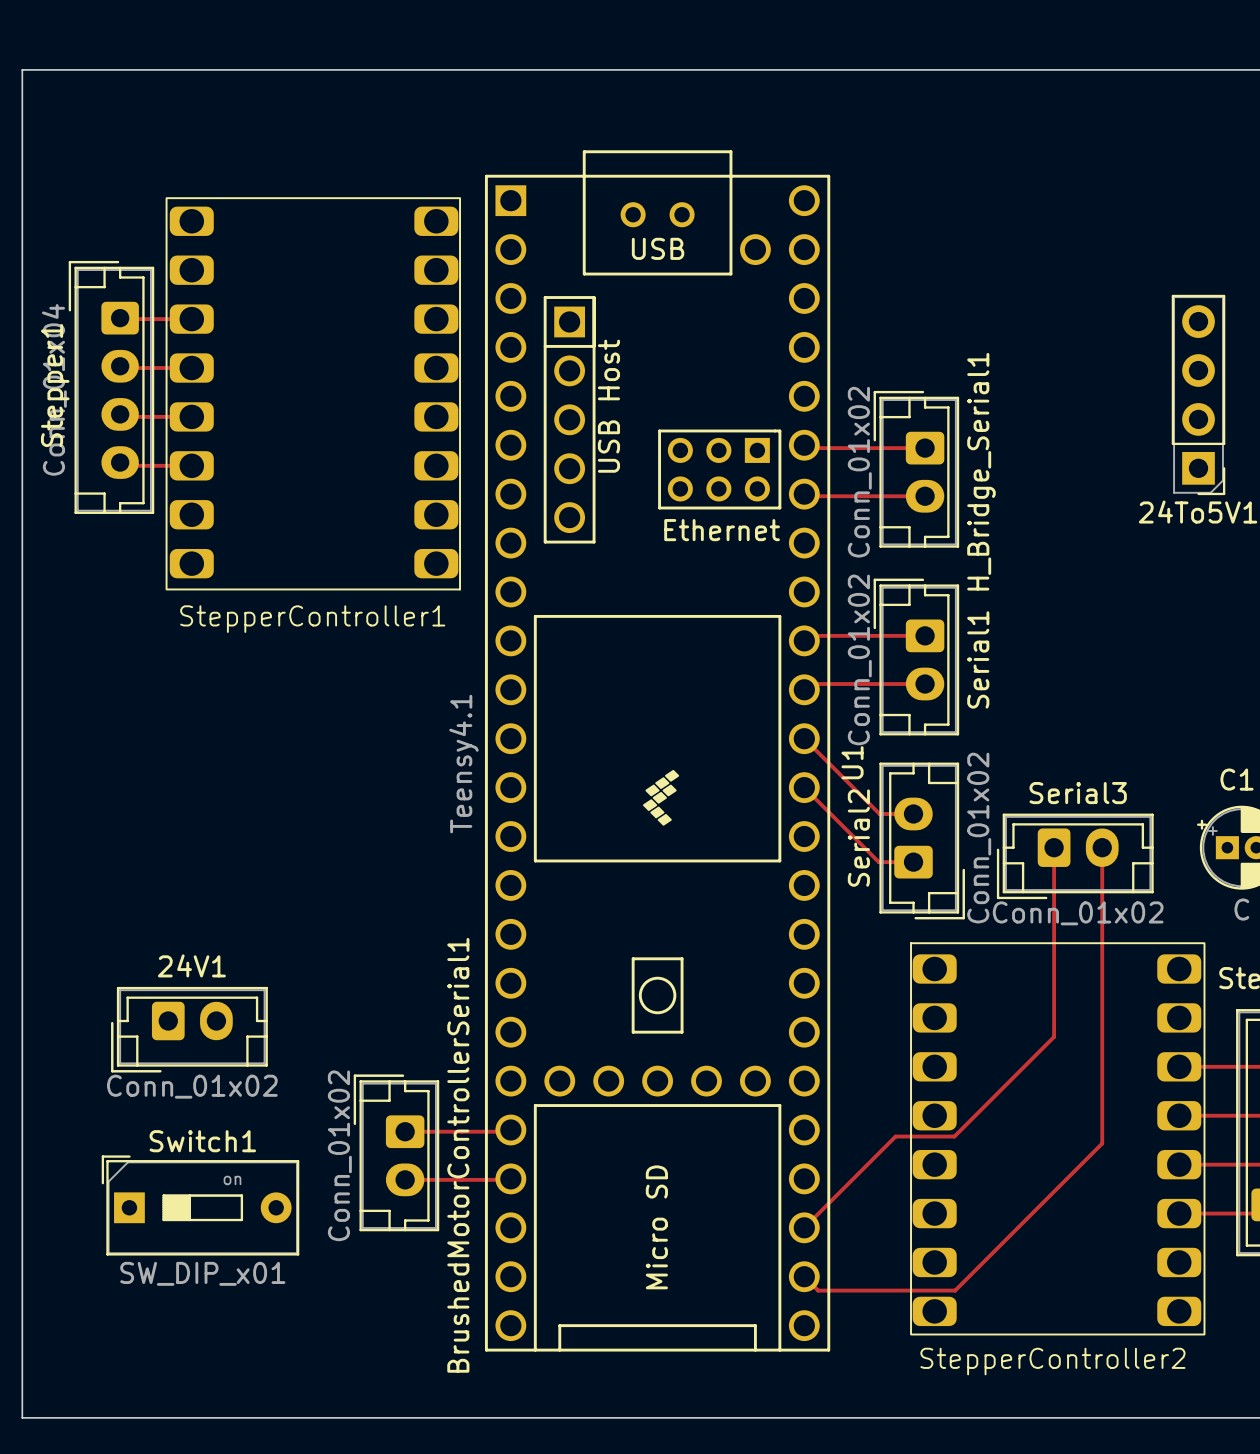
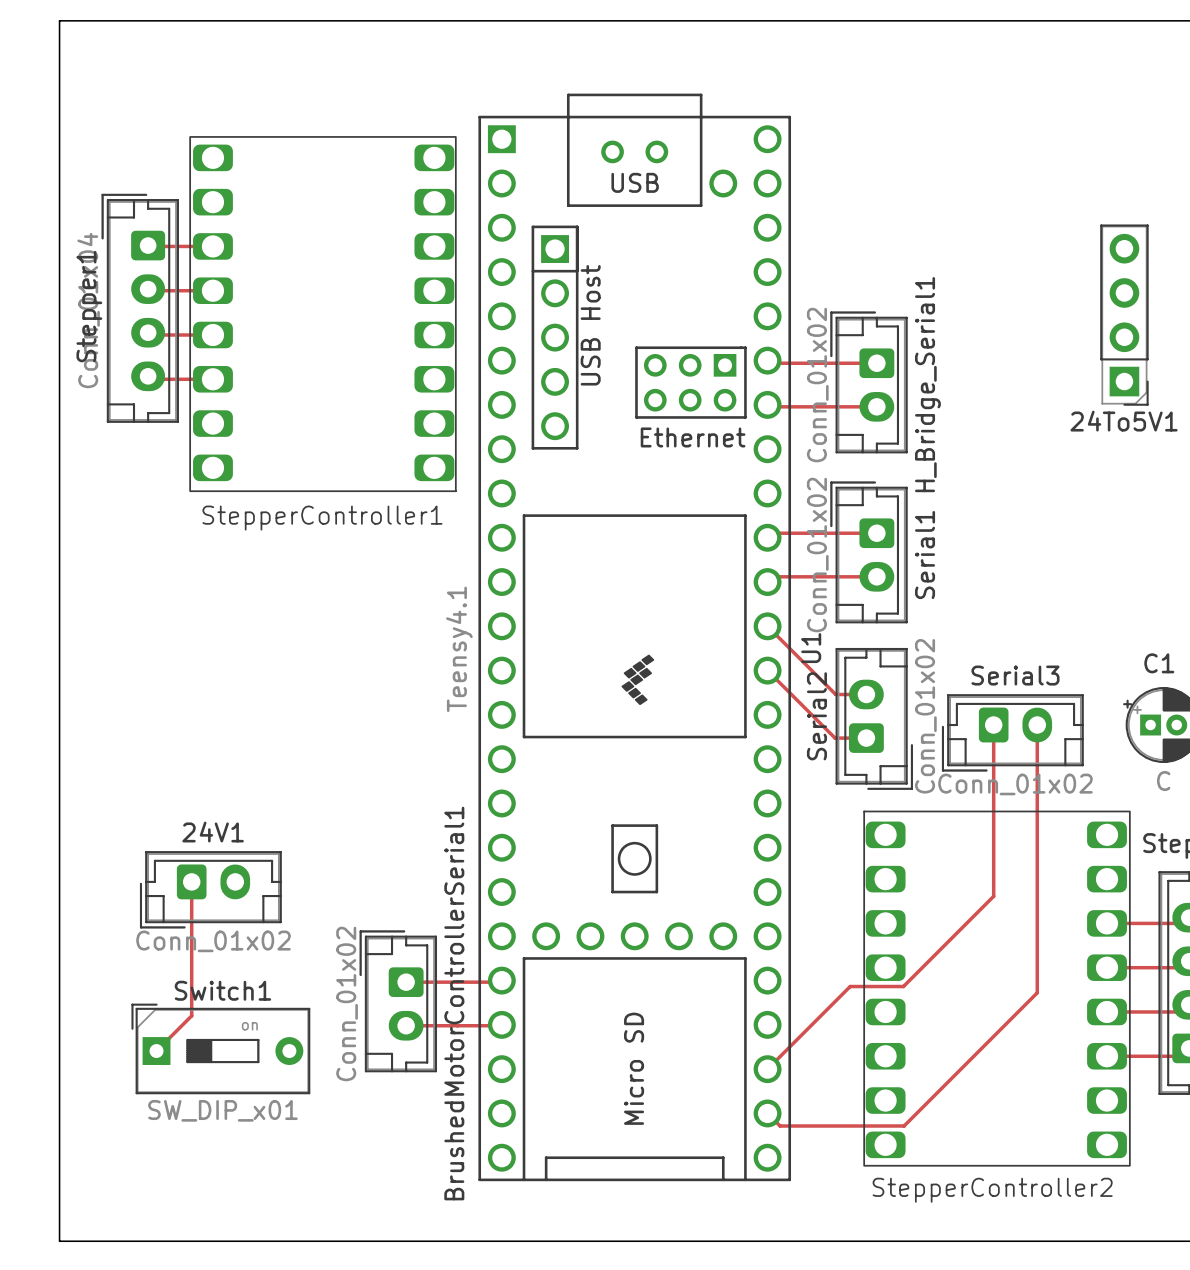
track: none -> (191, 881) (191, 1015) (156, 1051)

